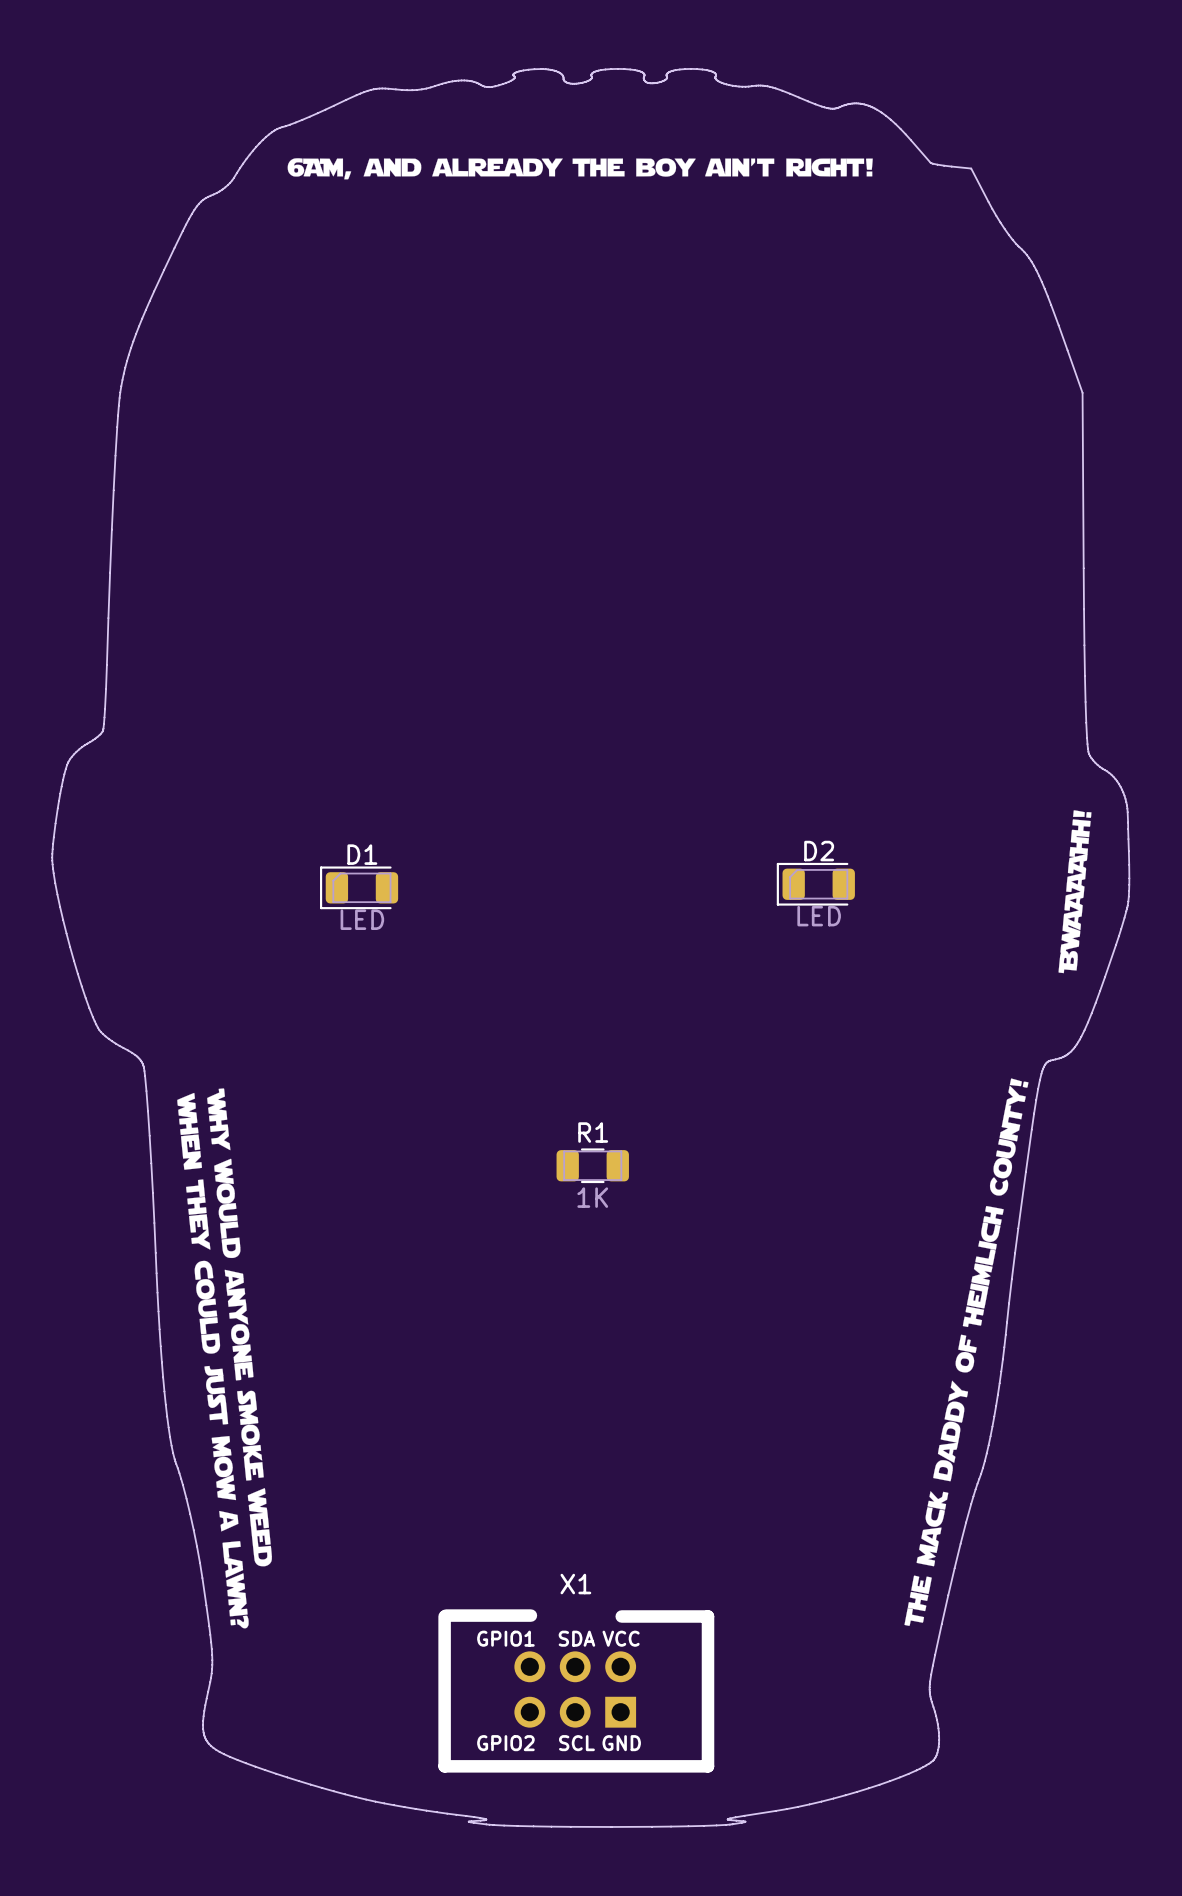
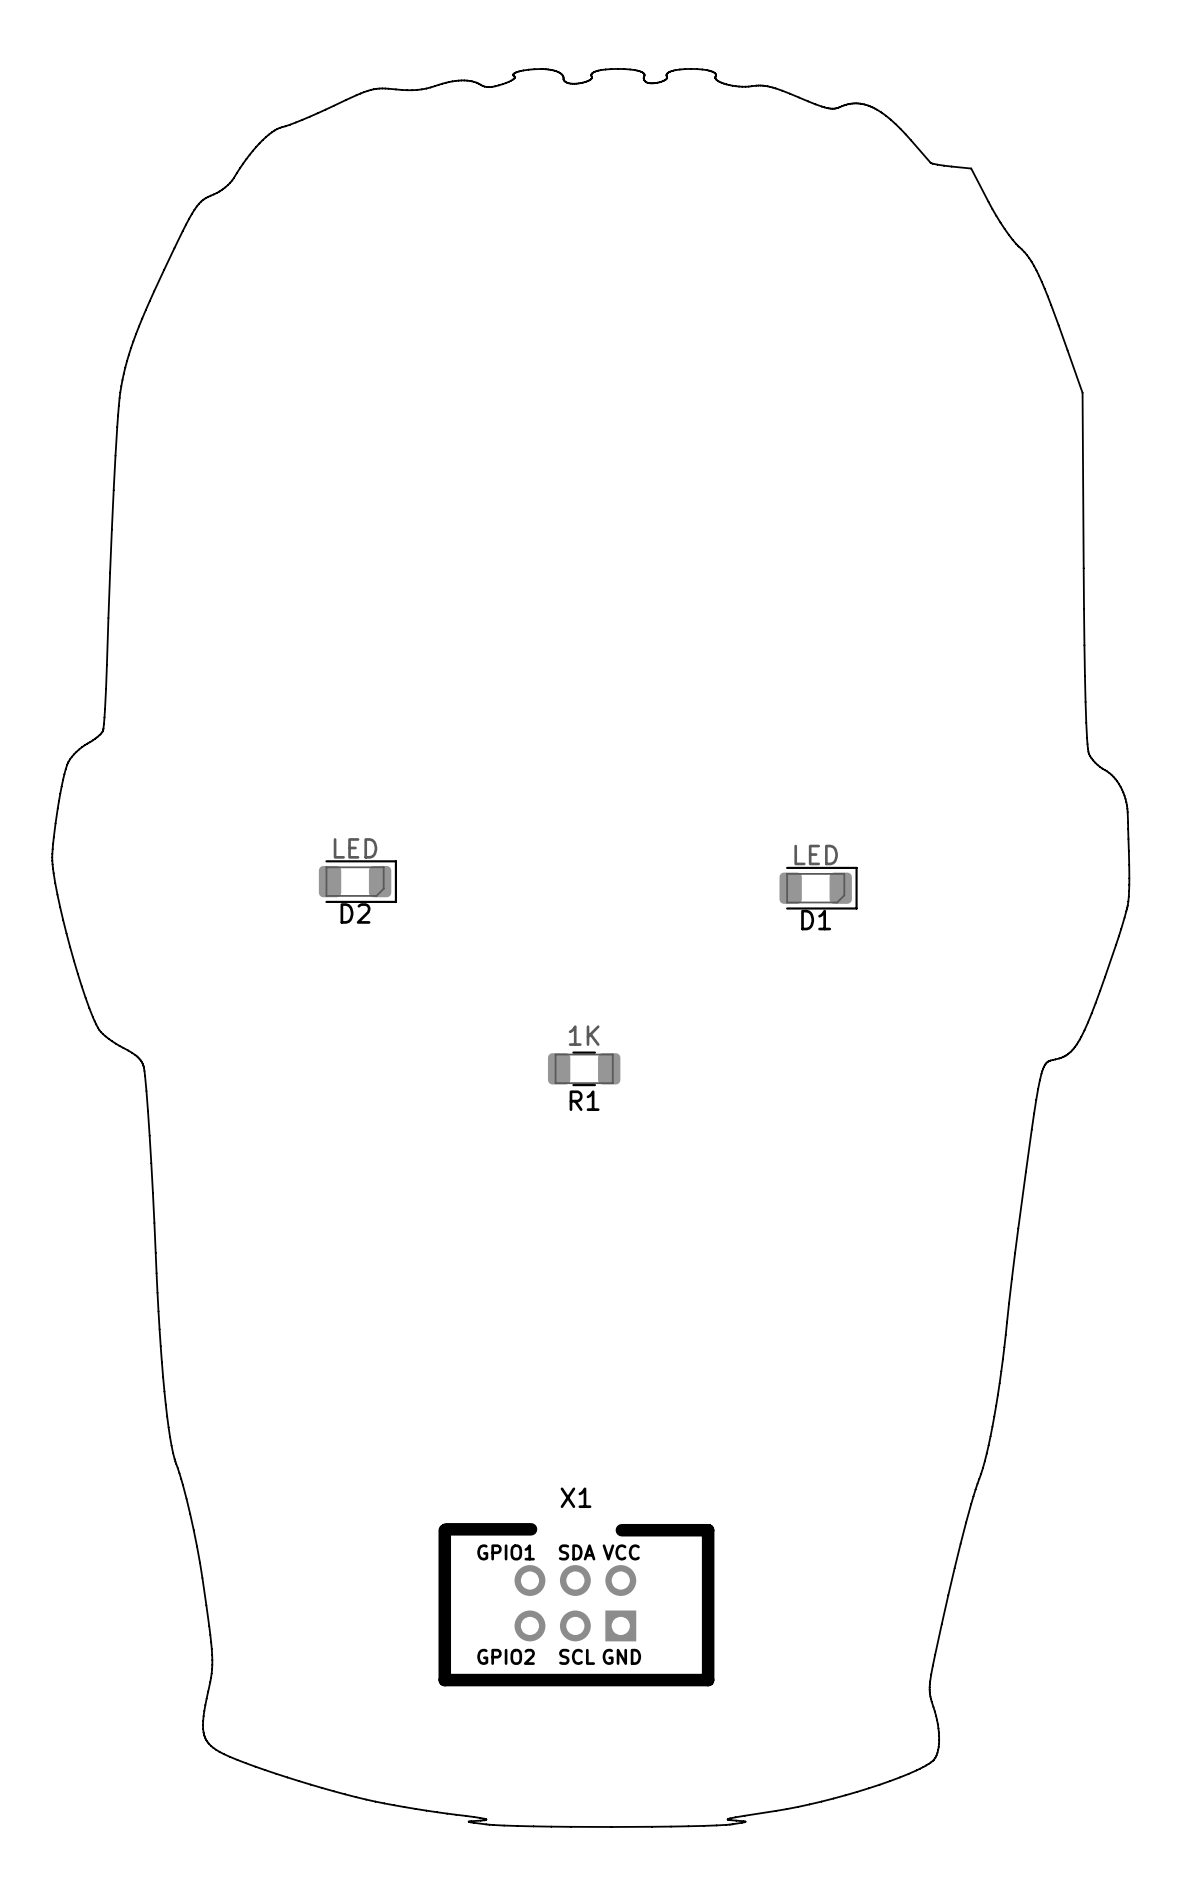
drawing: [177, 158, 1092, 1629] -> none
D2 rotation: 0° (815, 884) -> 180° (357, 881)
D2 position: (815, 884) -> (357, 881)
D1 rotation: 0° (359, 887) -> 180° (818, 888)
D1 position: (359, 887) -> (818, 888)
R1 name position: R1 (593, 1132) -> R1 (584, 1100)
R1 position: (592, 1165) -> (584, 1068)
R1 value position: 1K (592, 1197) -> 1K (584, 1035)
X1 position: (576, 1690) -> (576, 1604)

